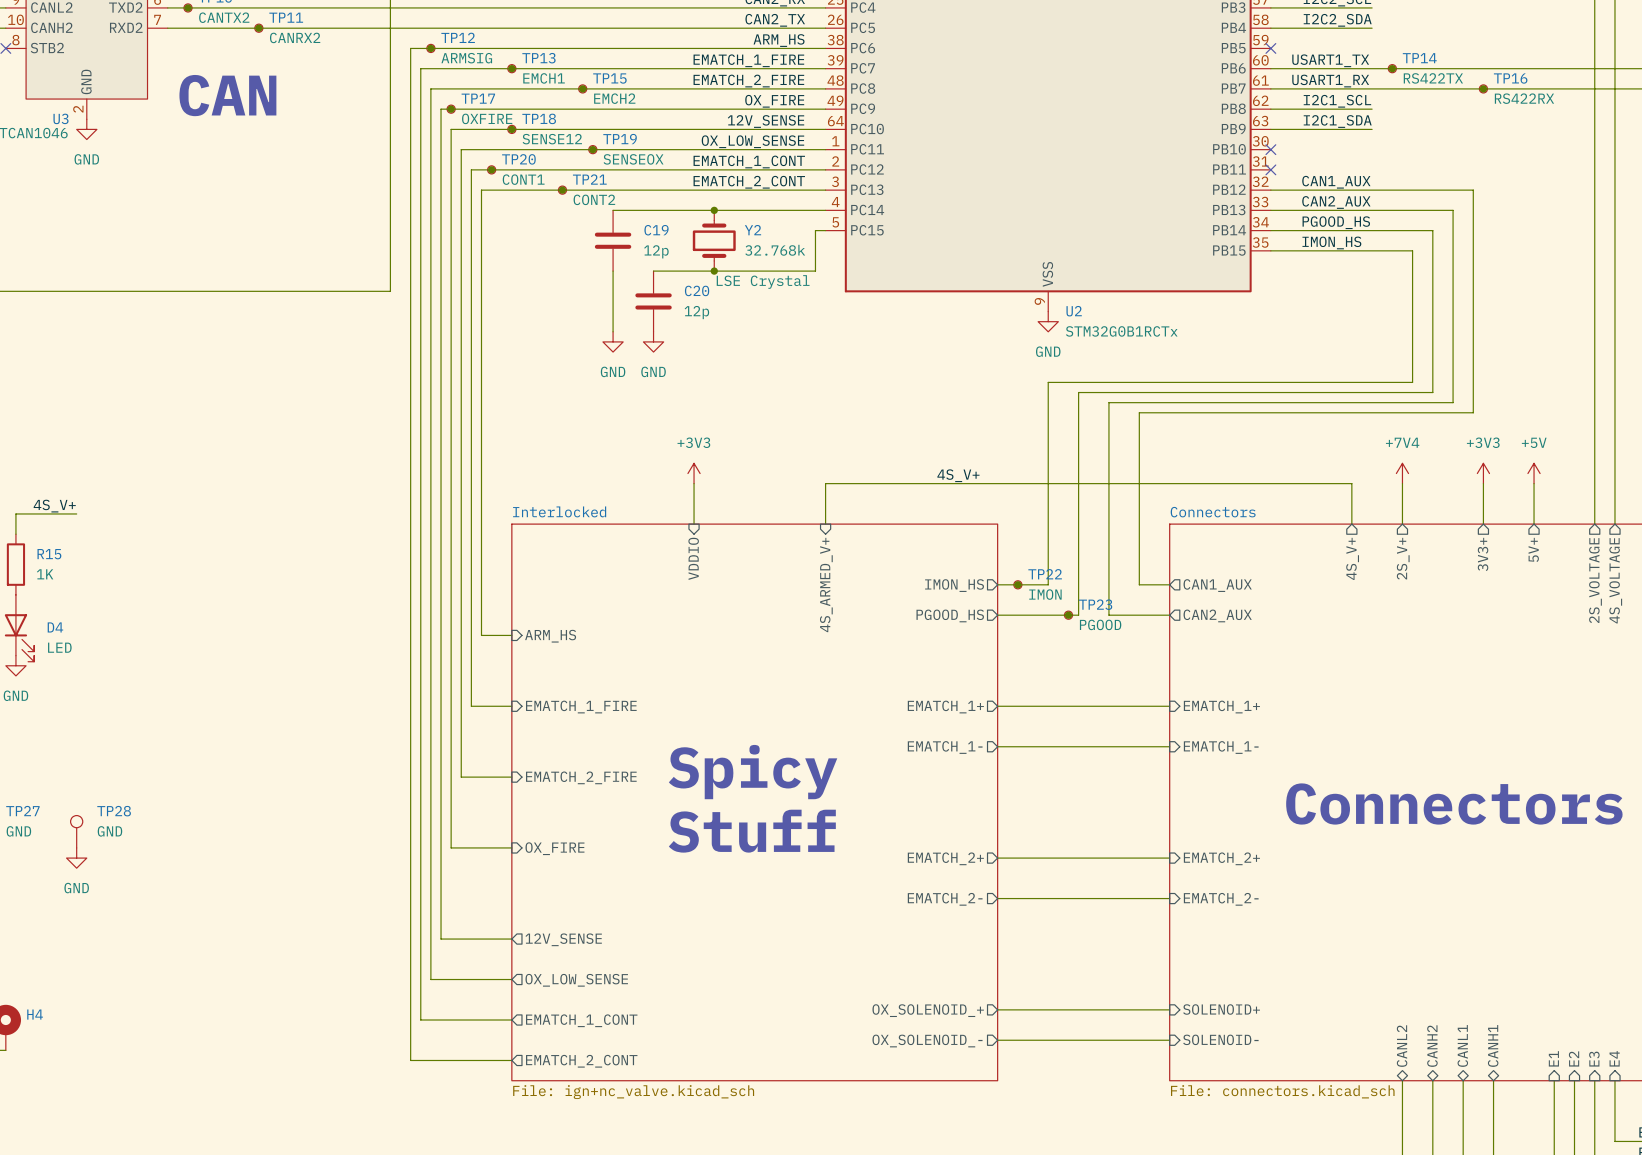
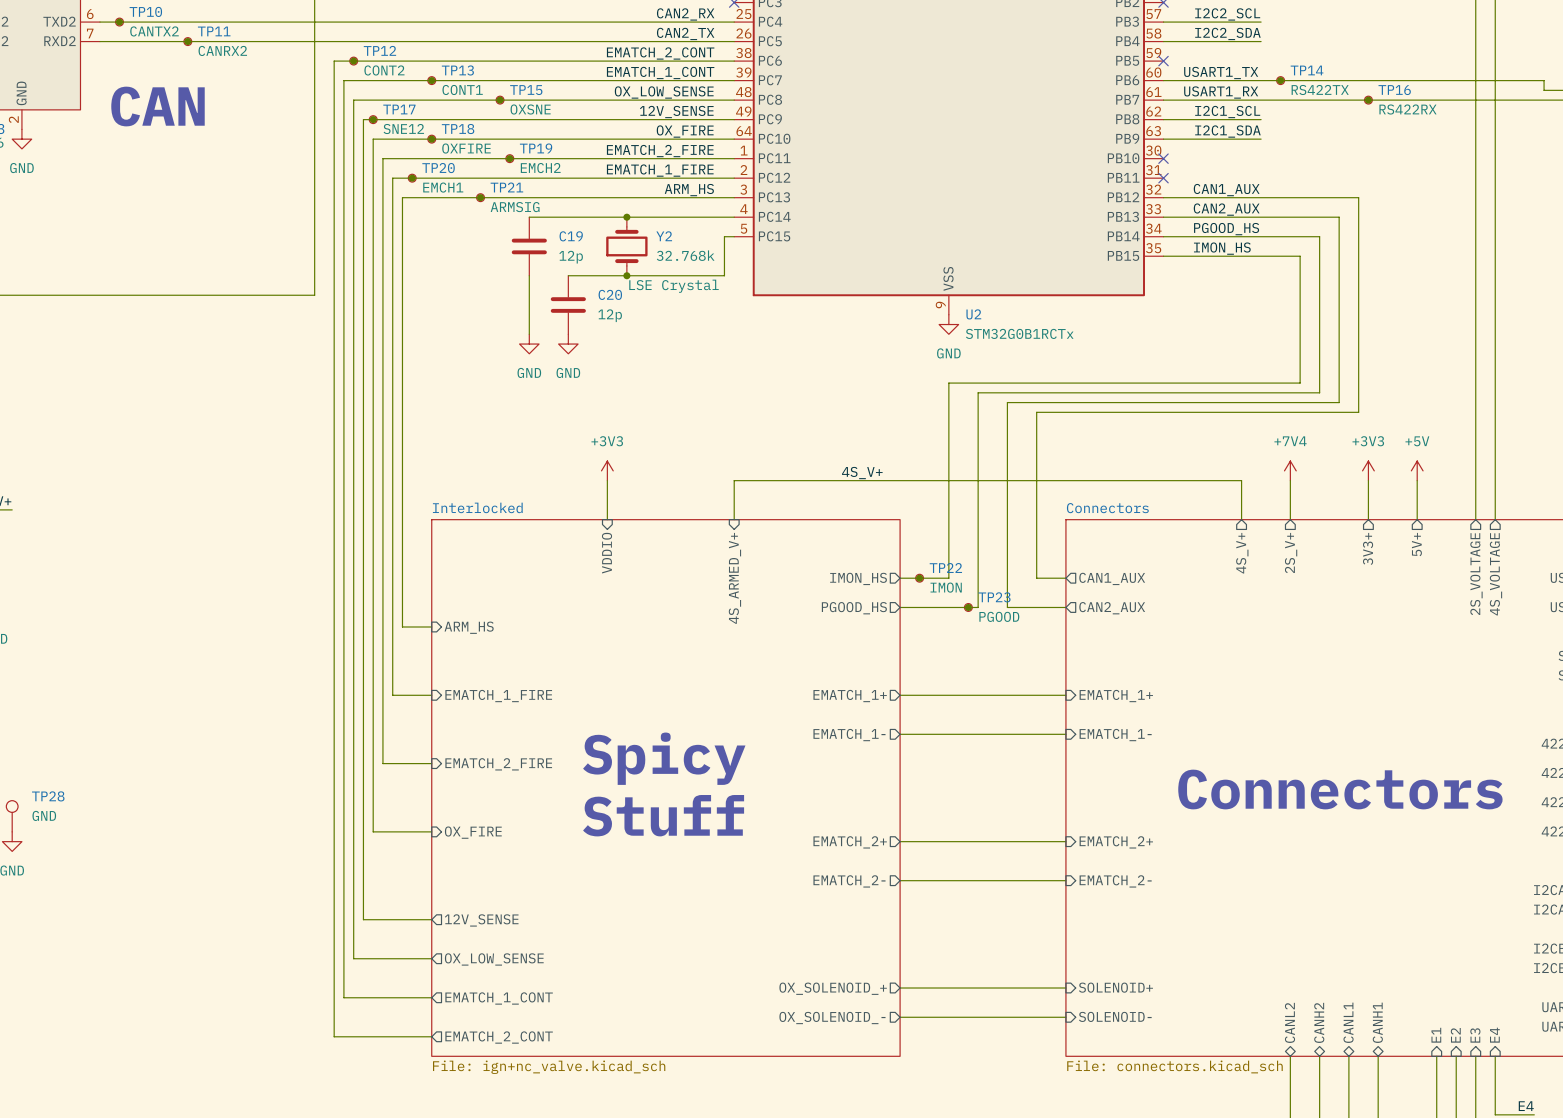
label: ARM_HS (779, 40) -> EMATCH_2_CONT (660, 53)
TP12 value: ARMSIG (466, 58) -> CONT2 (384, 70)
label: EMATCH_1_FIRE (748, 60) -> EMATCH_1_CONT (660, 72)
TP13 value: EMCH1 (544, 78) -> CONT1 (462, 89)
label: EMATCH_2_FIRE (748, 81) -> OX_LOW_SENSE (664, 92)
TP15 value: EMCH2 (614, 98) -> OXSNE (530, 109)
label: OX_FIRE (774, 101) -> 12V_SENSE (676, 112)
TP17 value: OXFIRE (487, 118) -> SNE12 (403, 129)
label: 12V_SENSE (766, 121) -> OX_FIRE (685, 131)
TP18 value: SENSE12 (552, 139) -> OXFIRE (466, 148)
label: OX_LOW_SENSE (752, 141) -> EMATCH_2_FIRE (660, 151)
TP19 value: SENSEOX (633, 159) -> EMCH2 (540, 168)
label: EMATCH_1_CONT (749, 161) -> EMATCH_1_FIRE (660, 170)
TP20 value: CONT1 (523, 179) -> EMCH1 (443, 187)
label: EMATCH_2_CONT (749, 182) -> ARM_HS (689, 190)
TP21 value: CONT2 (594, 199) -> ARMSIG (515, 207)

